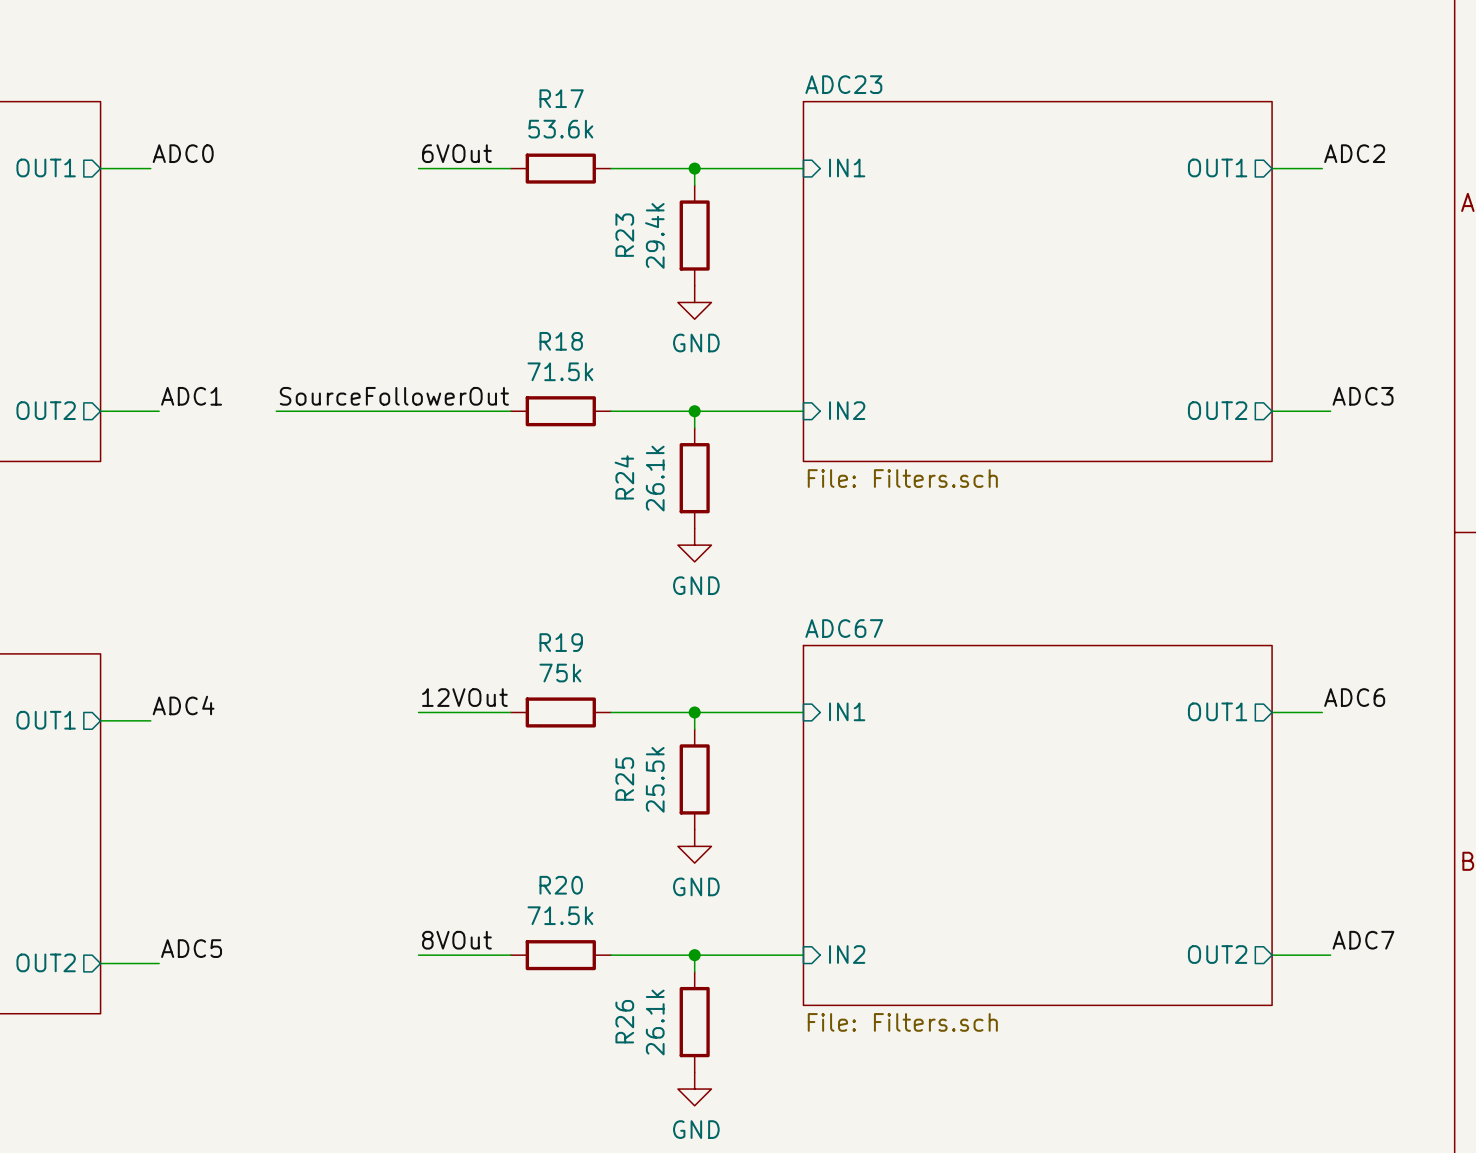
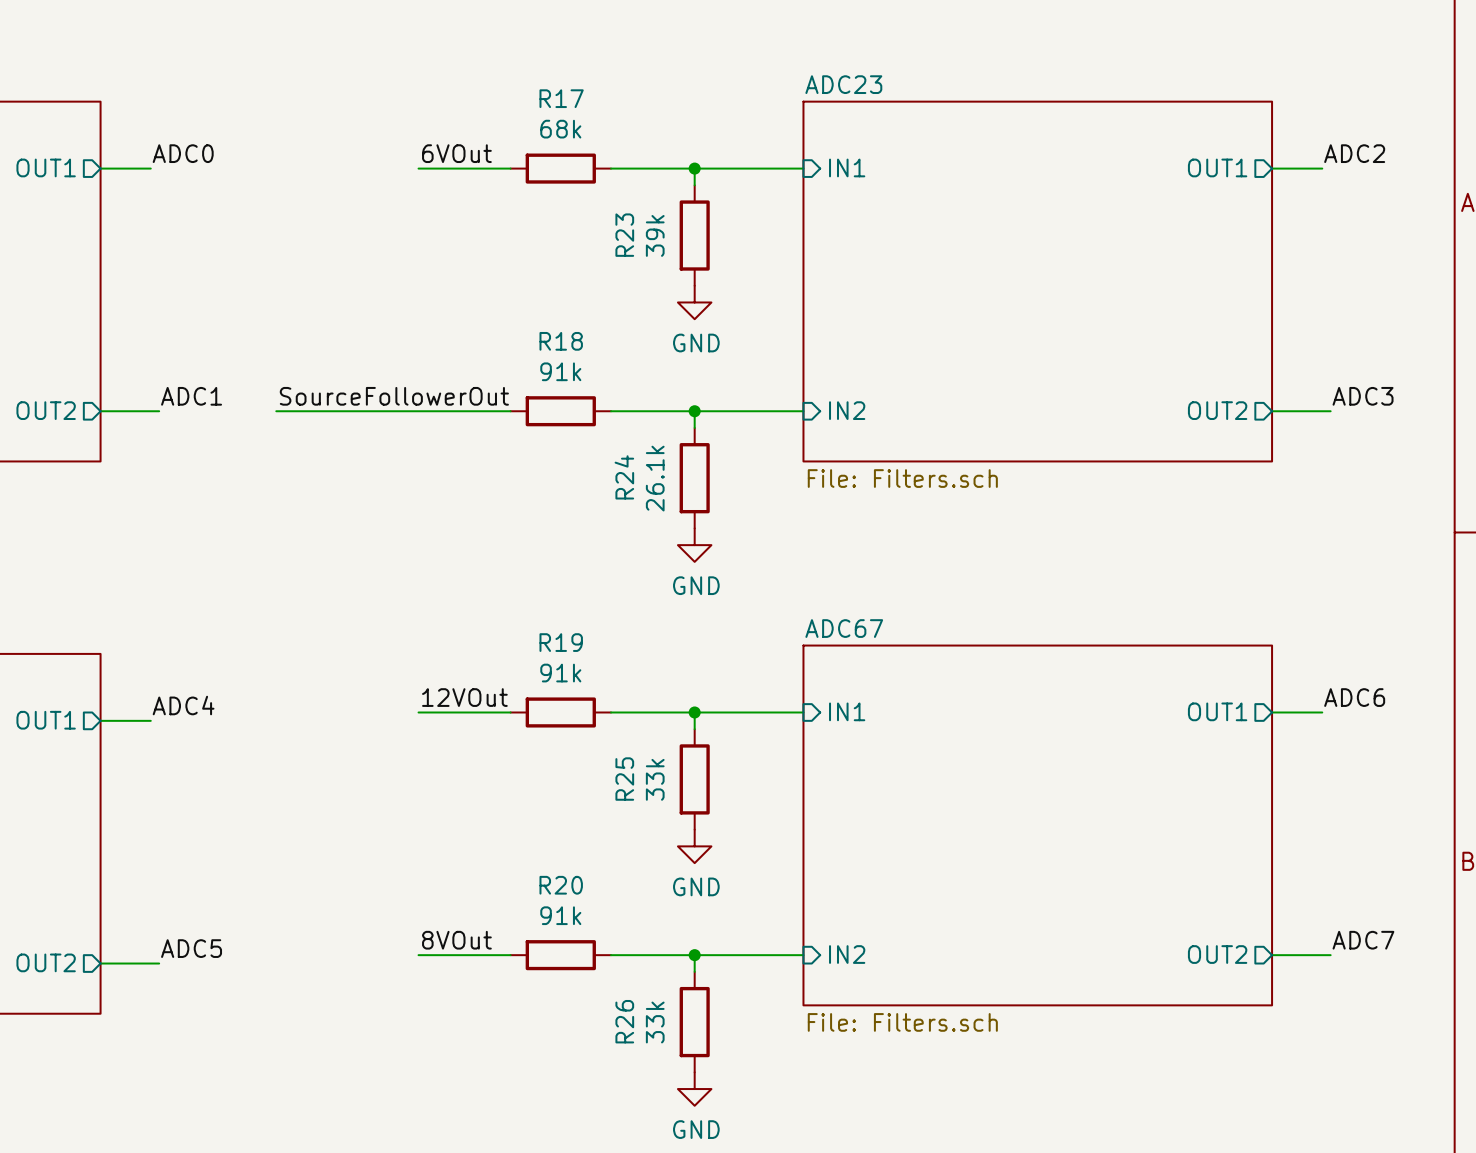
R17 value: 53.6k (560, 129) -> 68k (560, 129)
R23 value: 29.4k (654, 235) -> 39k (655, 235)
R18 value: 71.5k (560, 371) -> 91k (560, 371)
R19 value: 75k (560, 673) -> 91k (560, 673)
R25 value: 25.5k (655, 779) -> 33k (655, 779)
R20 value: 71.5k (560, 915) -> 91k (560, 915)
R26 value: 26.1k (655, 1022) -> 33k (655, 1022)

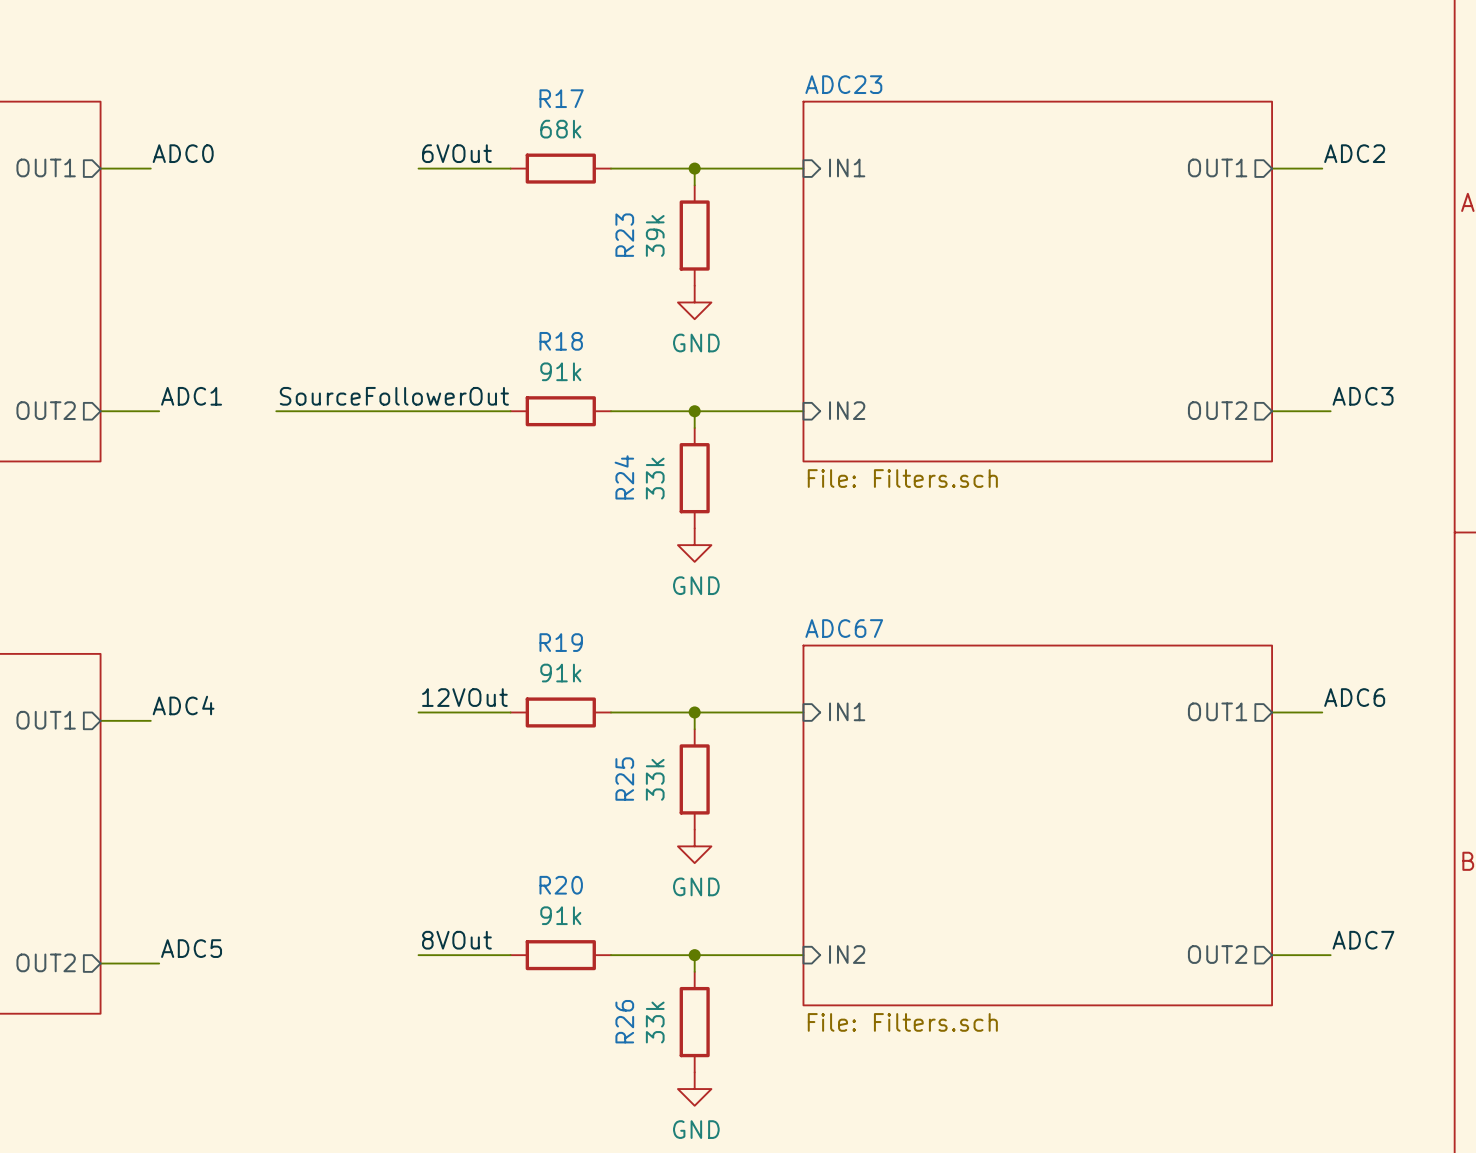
R24 value: 26.1k (655, 478) -> 33k (655, 478)

